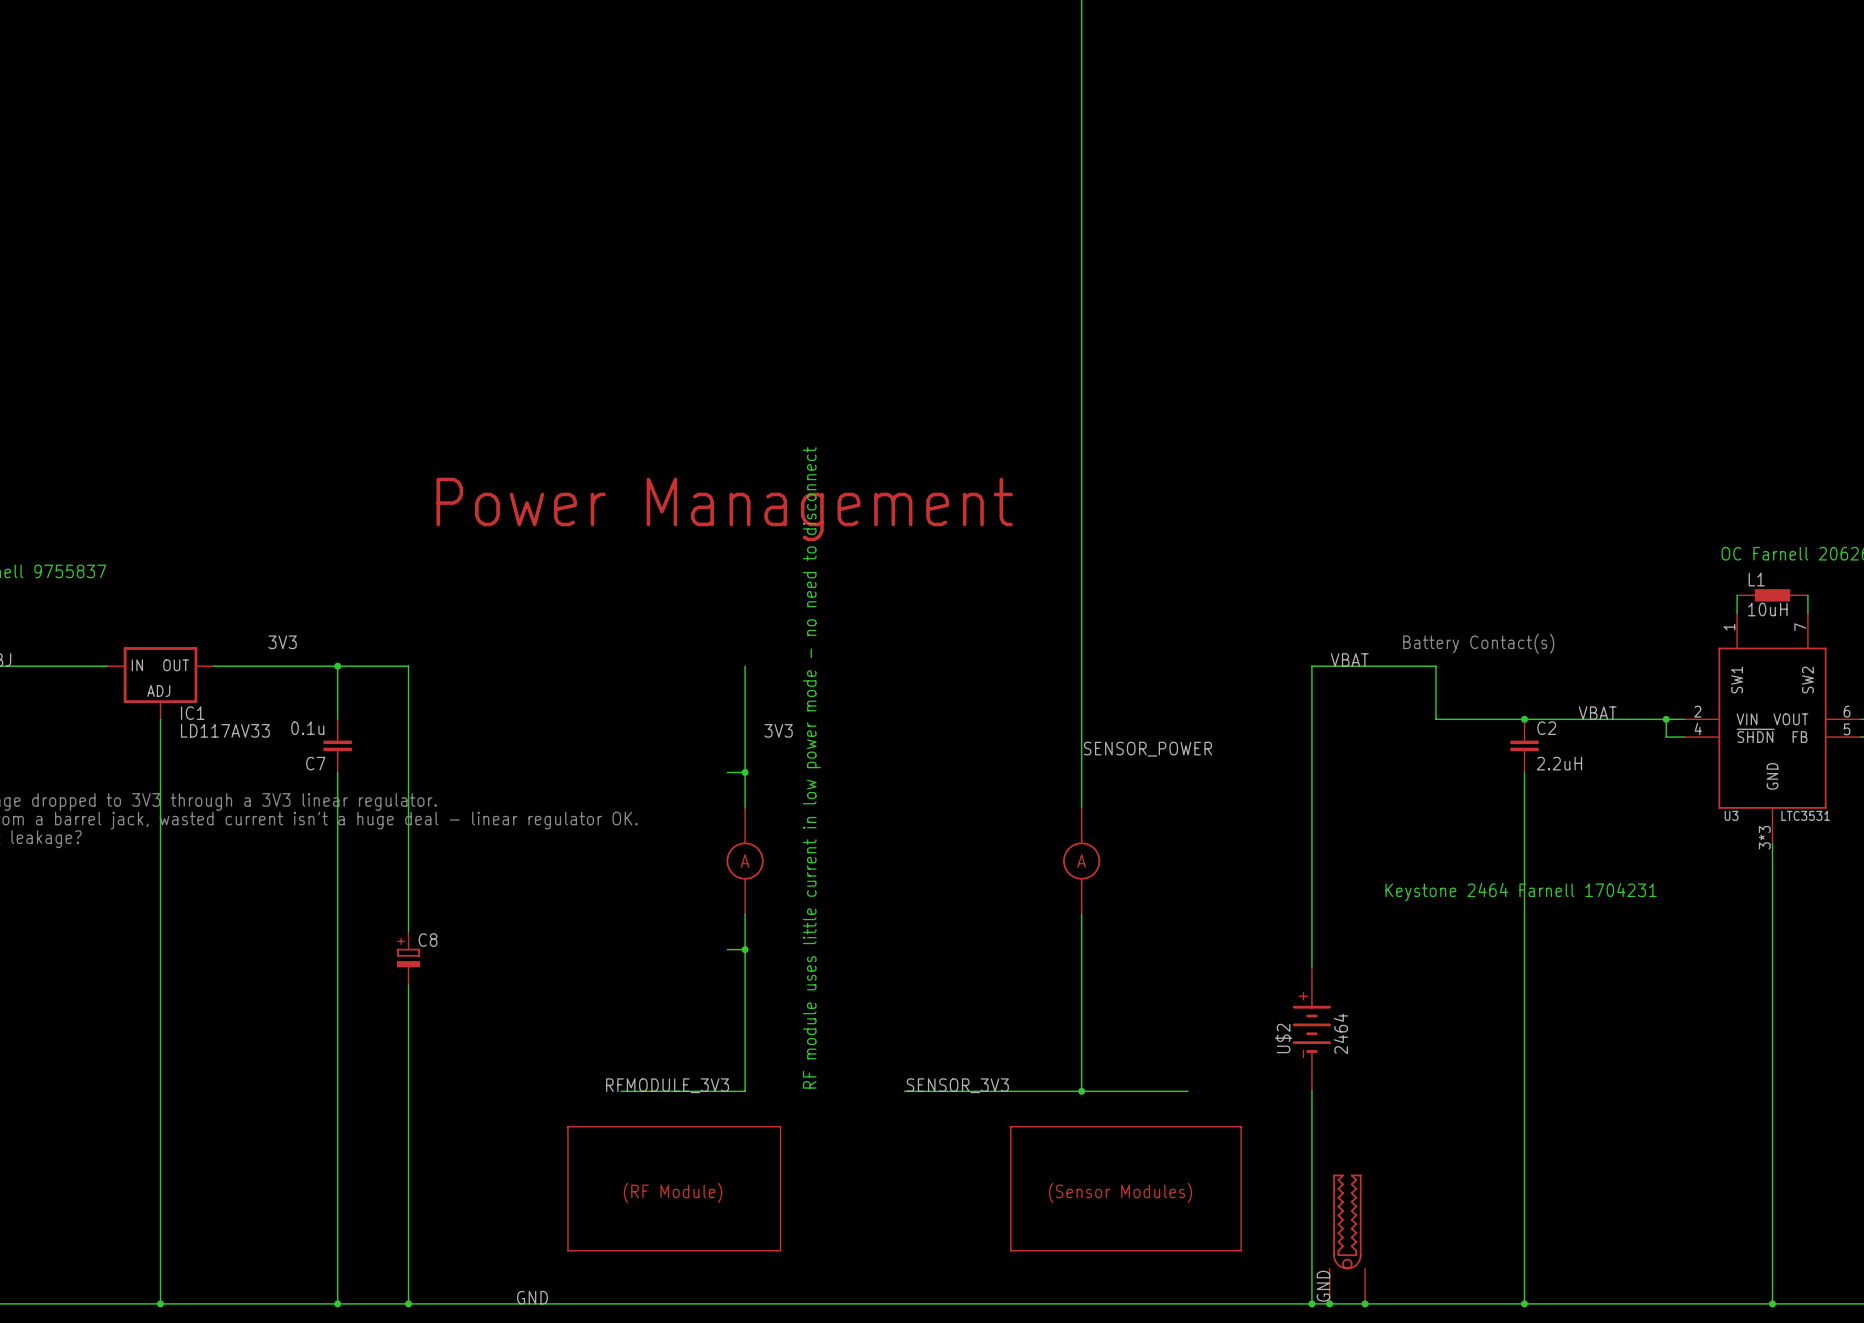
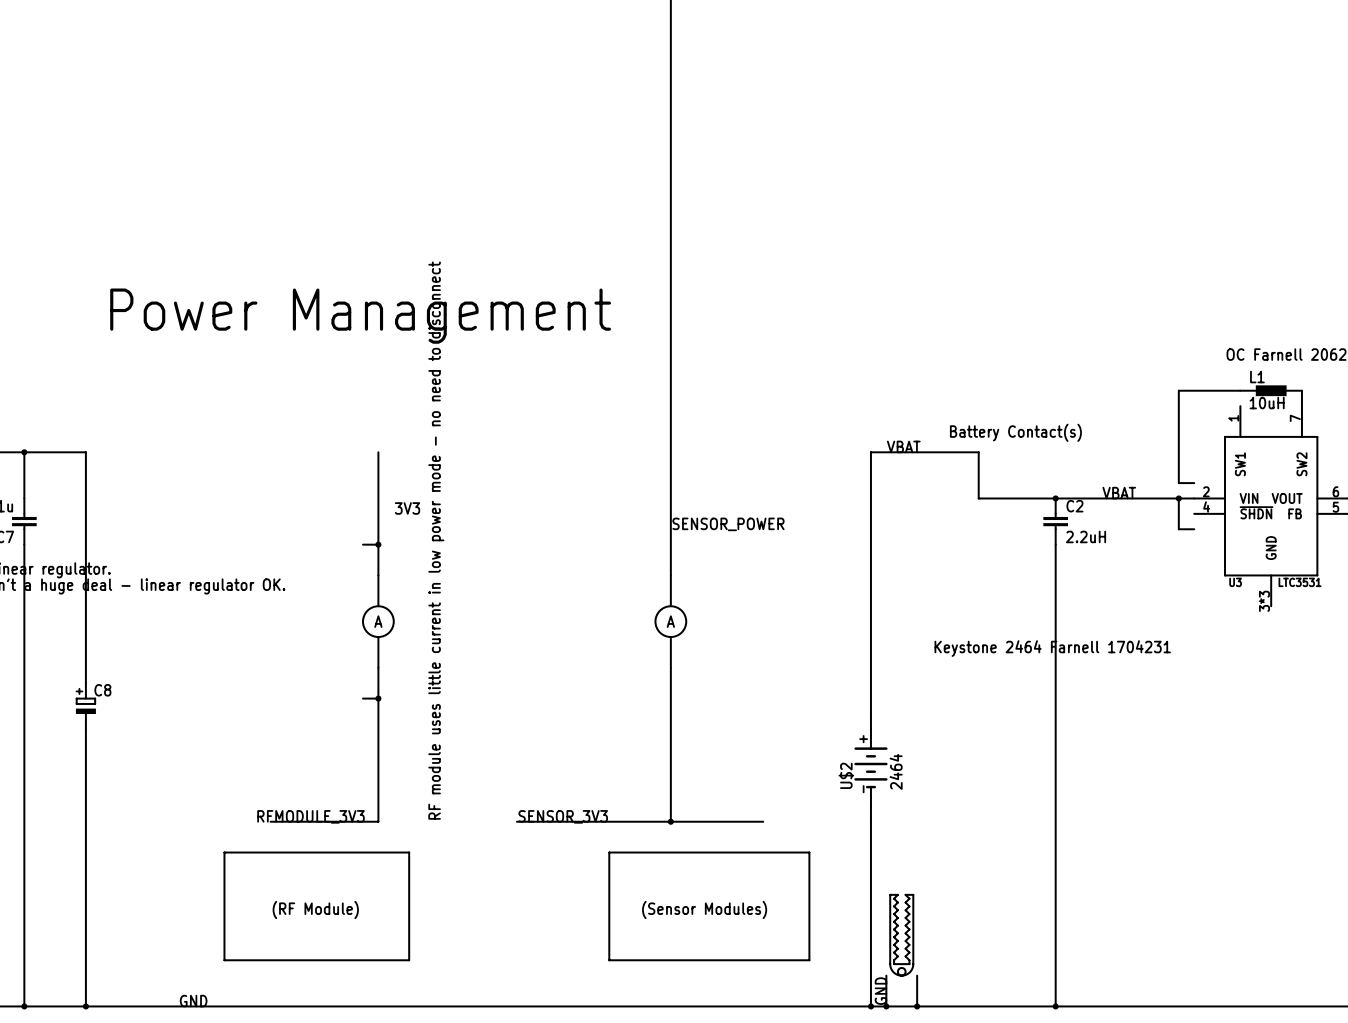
wire: (1737, 595) (1737, 613) -> (1240, 390) (1178, 390) (1178, 483) (1194, 483)
wire: (1666, 737) (1683, 737) -> (1178, 513) (1178, 529) (1194, 529)
wire: (1772, 843) (1772, 1303) -> none
junction: (1772, 1303) -> none

